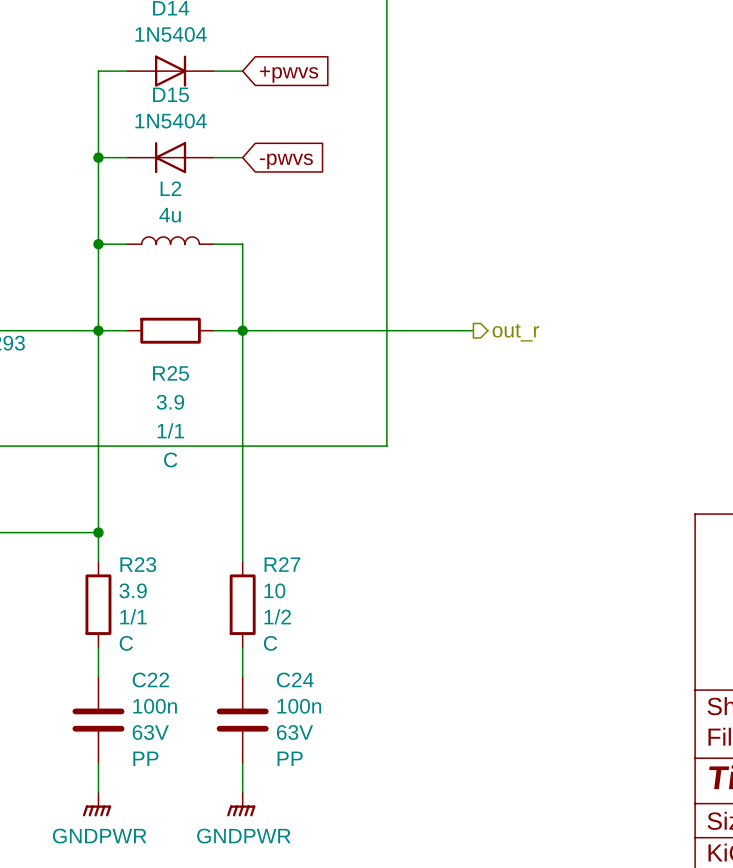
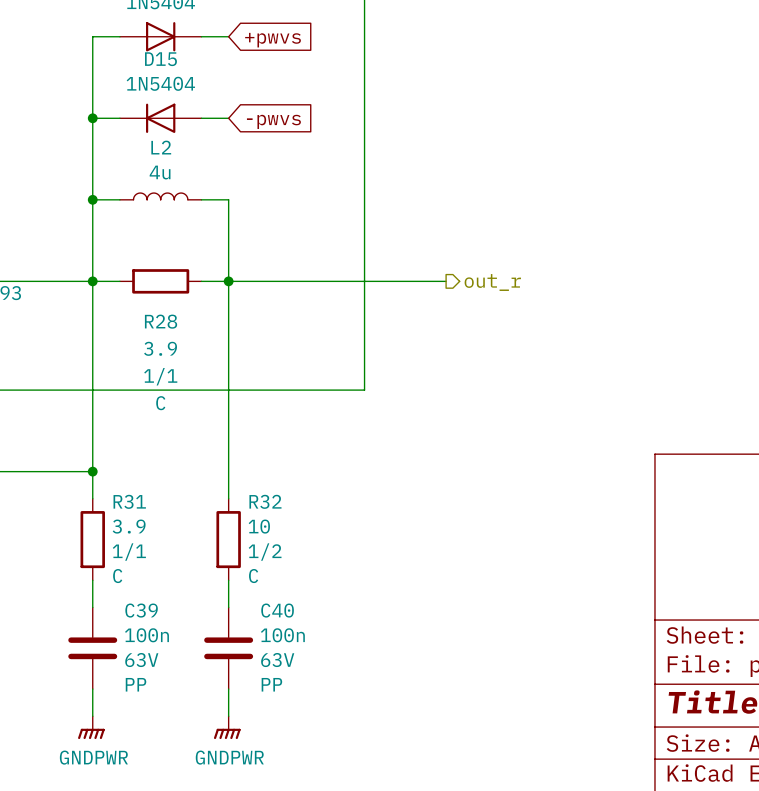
R25 name: R25 (170, 373) -> R28 (161, 321)
R23 name: R23 (138, 564) -> R31 (129, 501)
R27 name: R27 (282, 564) -> R32 (265, 501)
C22 name: C22 (150, 680) -> C39 (141, 610)
C24 name: C24 (295, 680) -> C40 (277, 610)

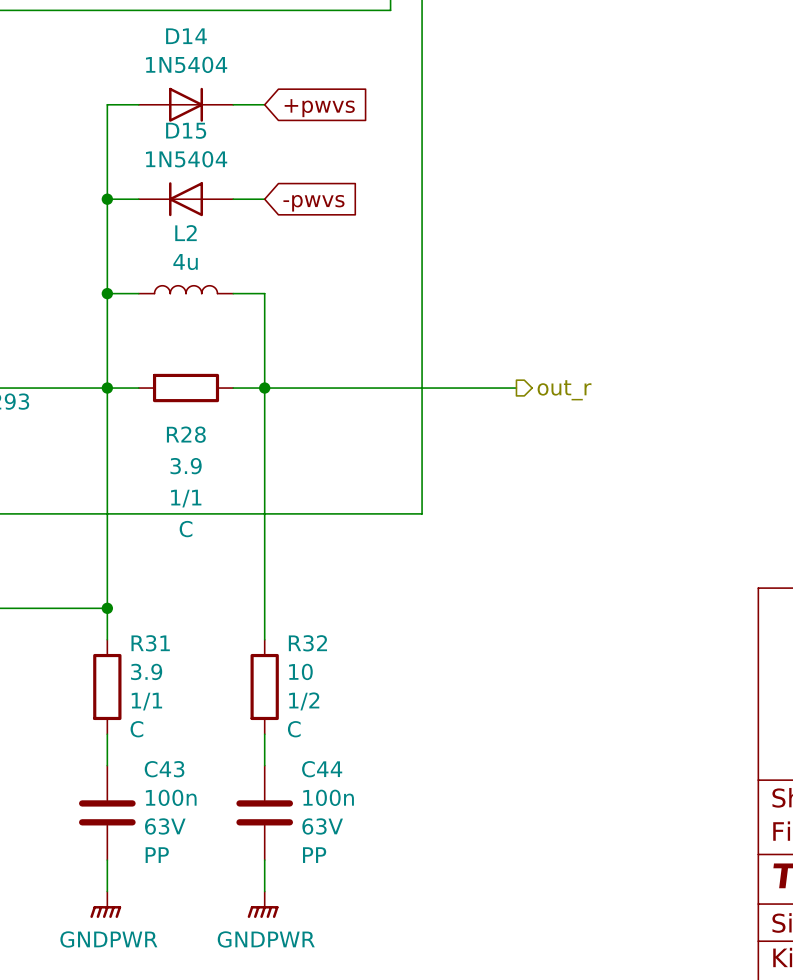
C39 name: C39 (141, 610) -> C43 (164, 769)
C40 name: C40 (277, 610) -> C44 (322, 769)

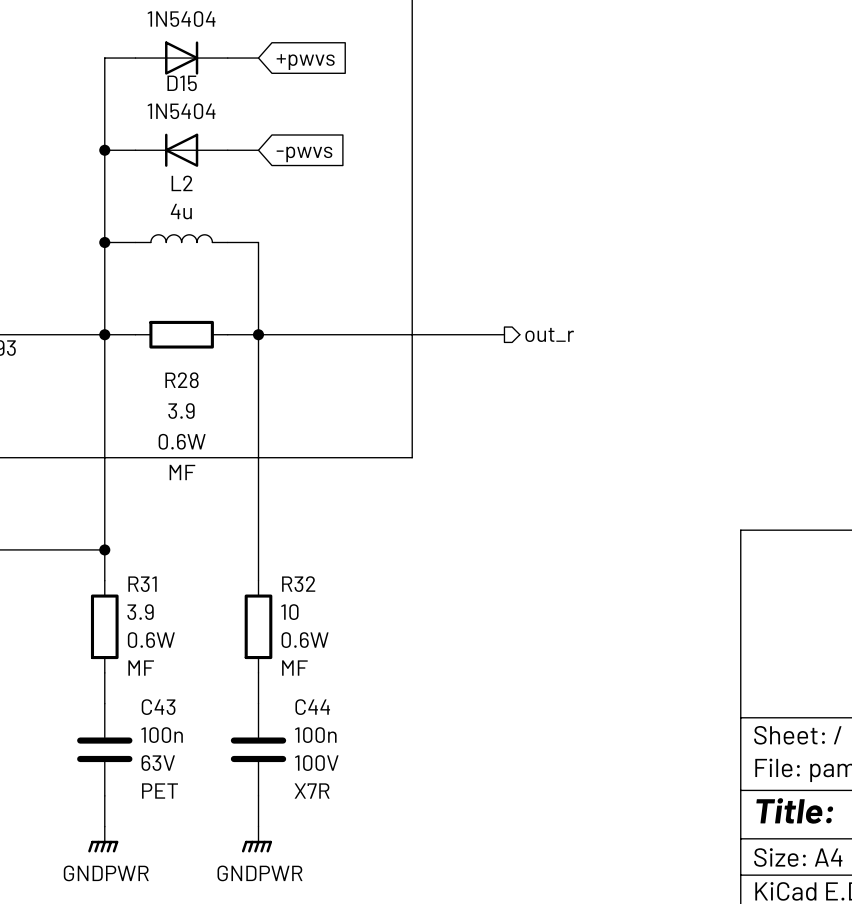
R28 text: 1/1 (186, 498) -> 0.6W (182, 441)
R28 text: C (186, 529) -> MF (182, 472)
R31 text: 1/1 (146, 701) -> 0.6W (151, 640)
R32 text: 1/2 (304, 701) -> 0.6W (305, 640)
R31 text: C (136, 729) -> MF (141, 668)
R32 text: C (294, 729) -> MF (294, 668)
C44 text: 63V (322, 826) -> 100V (316, 763)
C43 text: PP (157, 855) -> PET (160, 791)
C44 text: PP (314, 855) -> X7R (312, 791)

